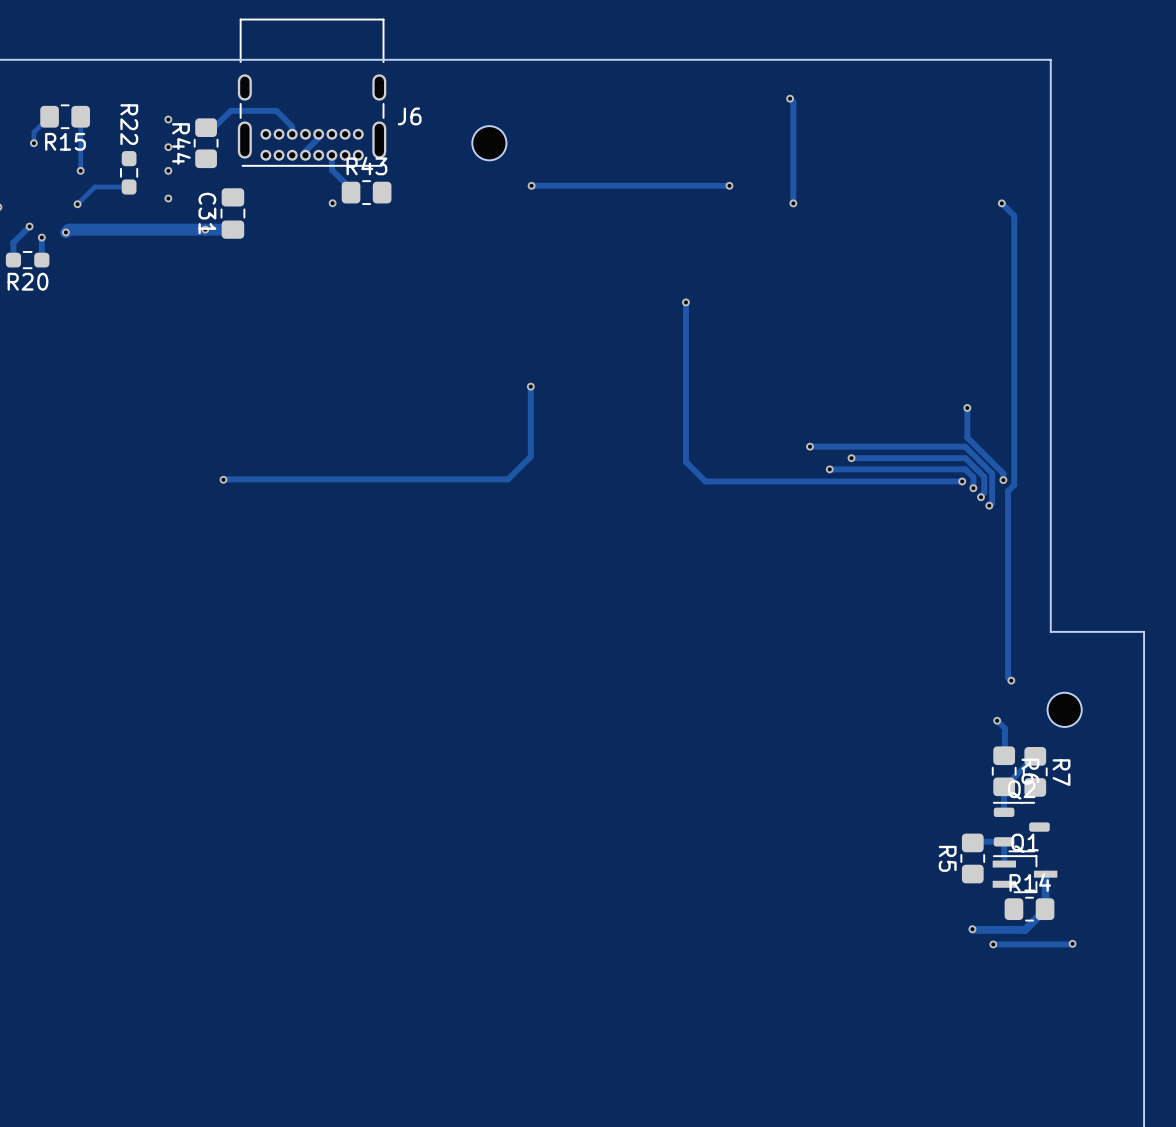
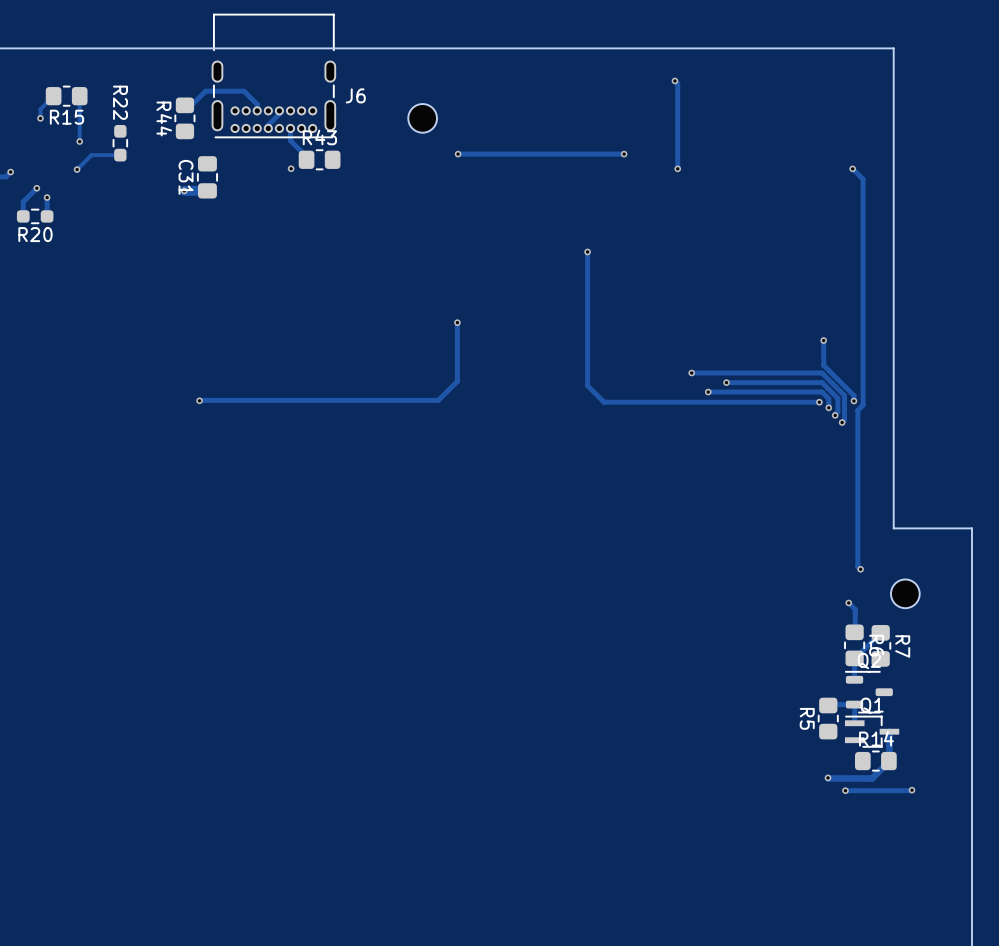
via: (168, 119) -> none
via: (168, 147) -> none
via: (168, 170) -> none
via: (168, 198) -> none
track: (205, 229) (68, 229) (65, 232) -> none
via: (65, 232) -> none

